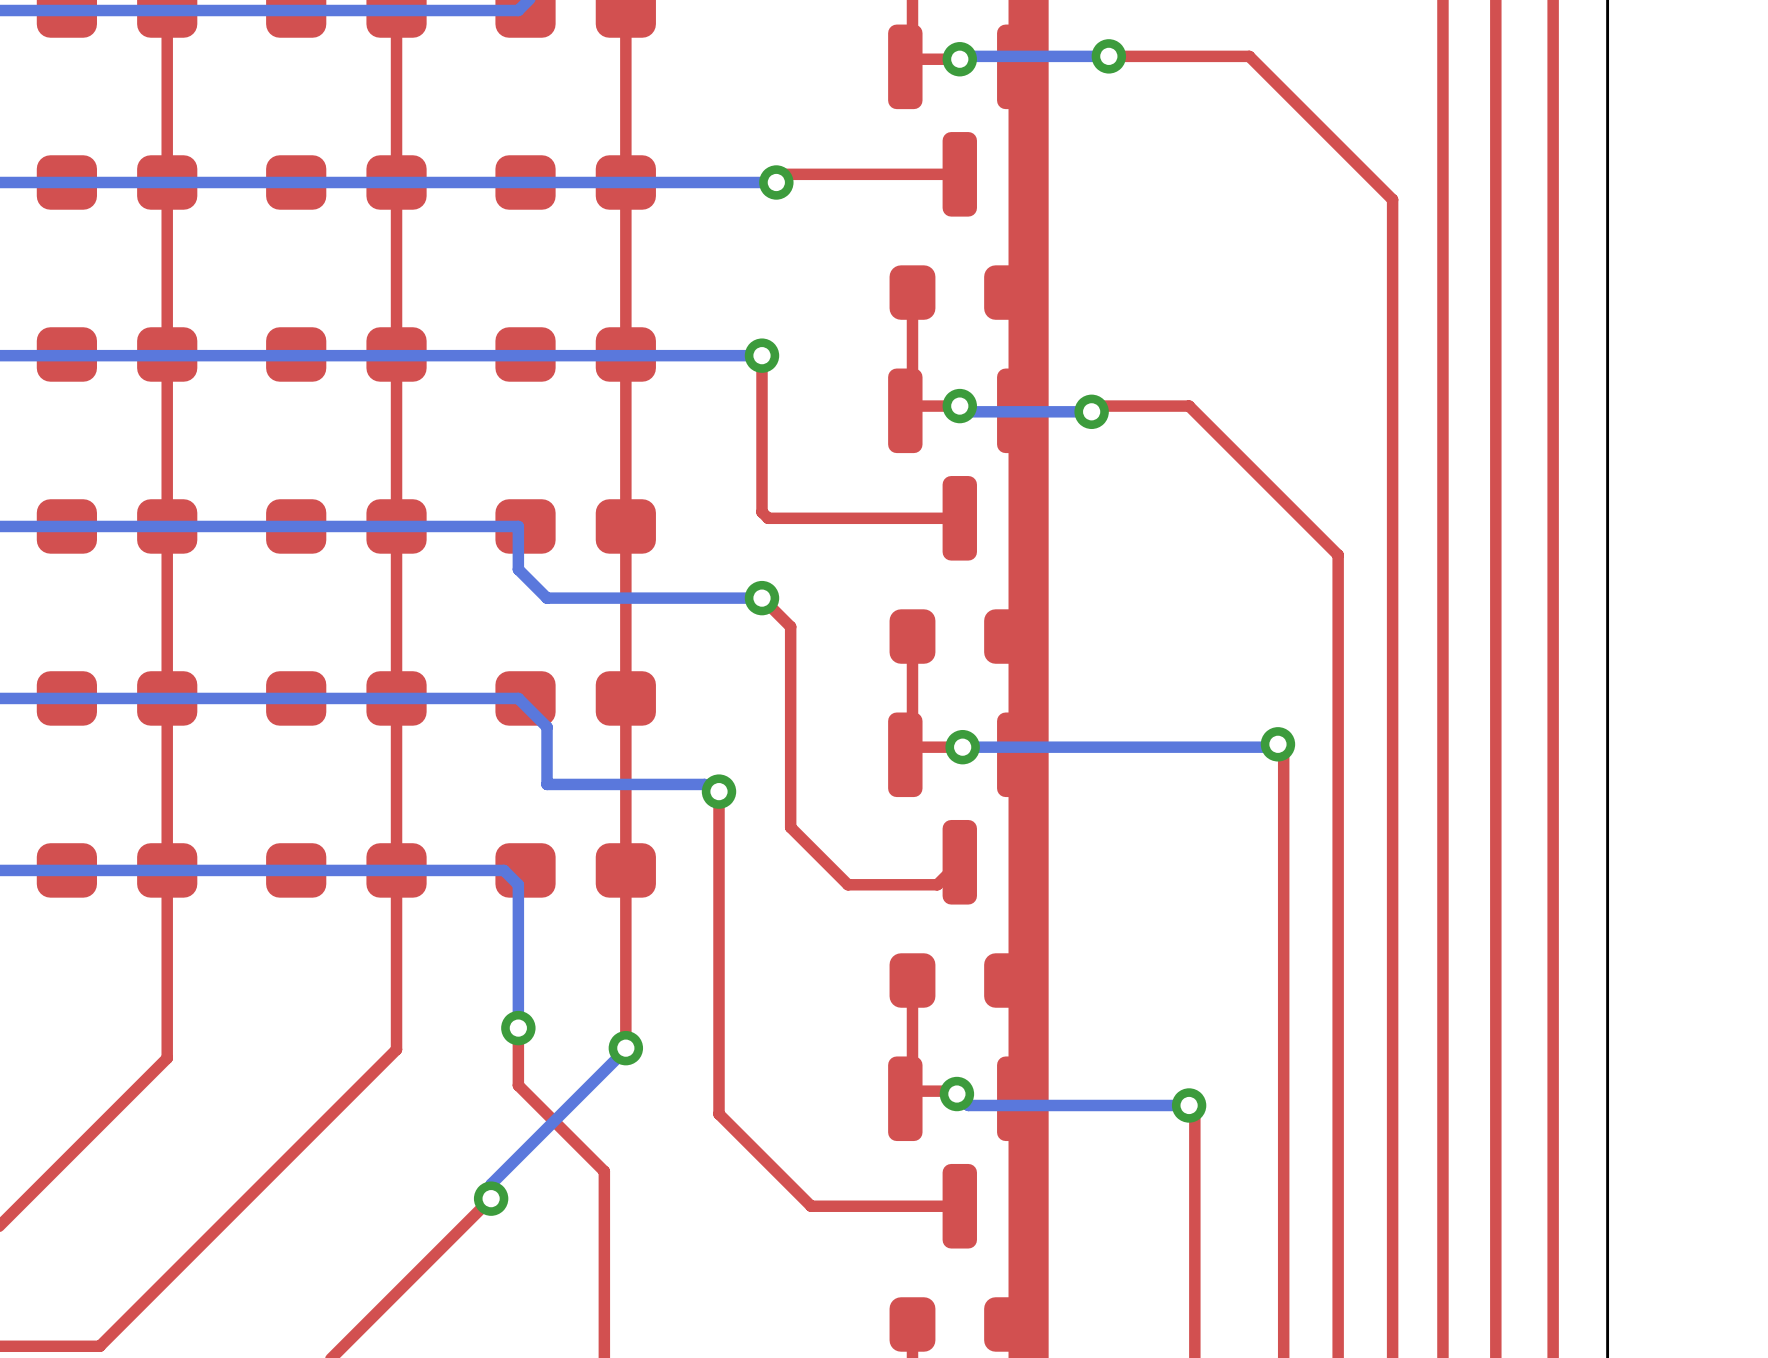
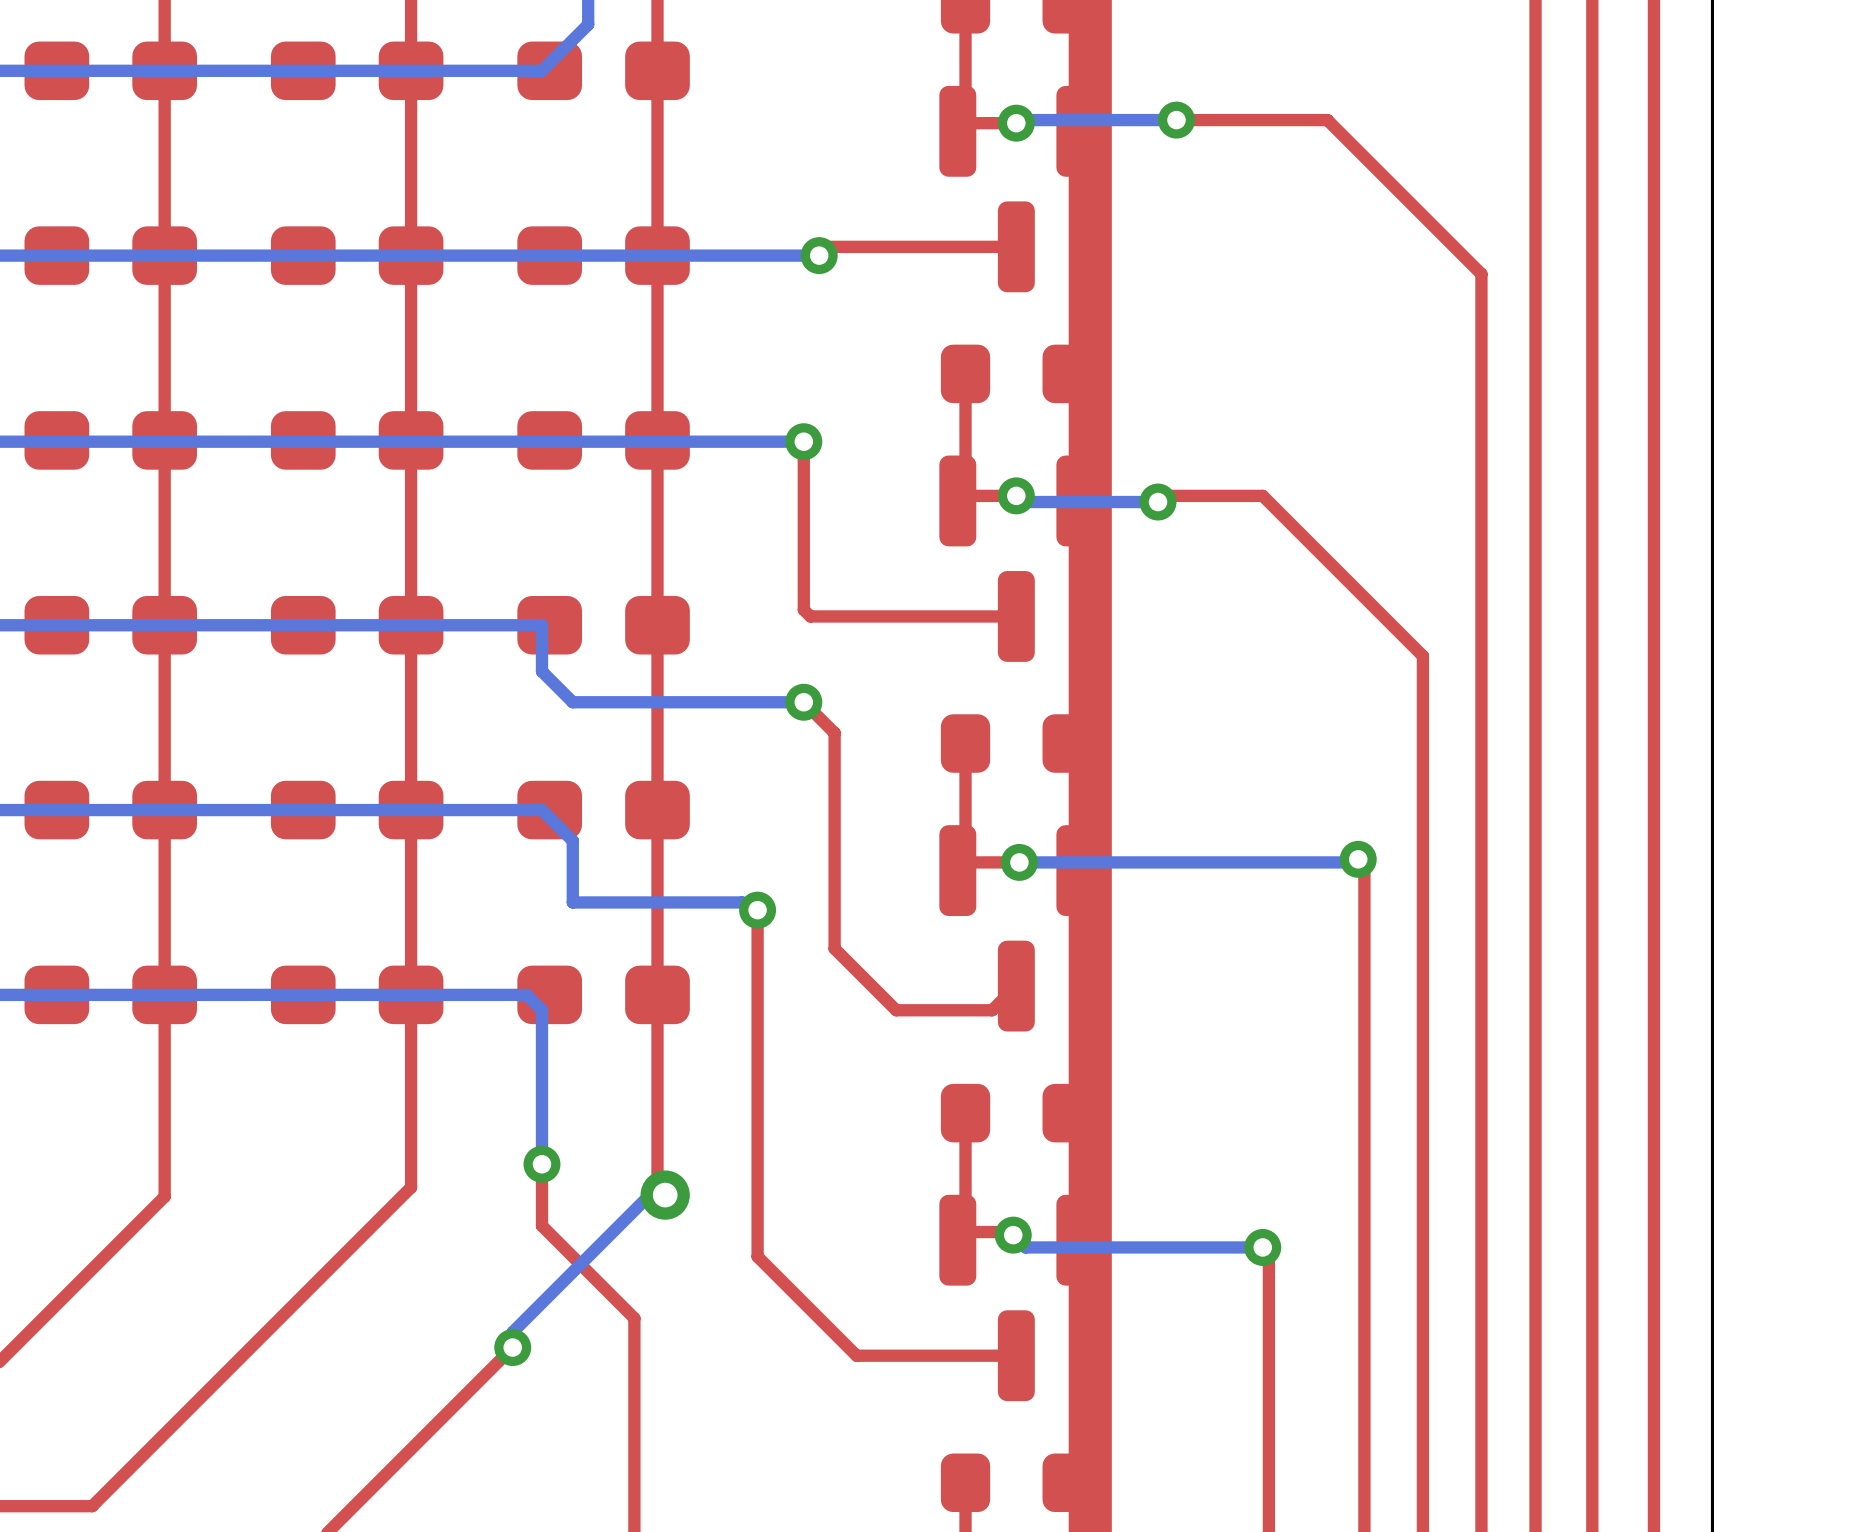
via size: [608, 1030, 644, 1066] -> [640, 1170, 690, 1220]

